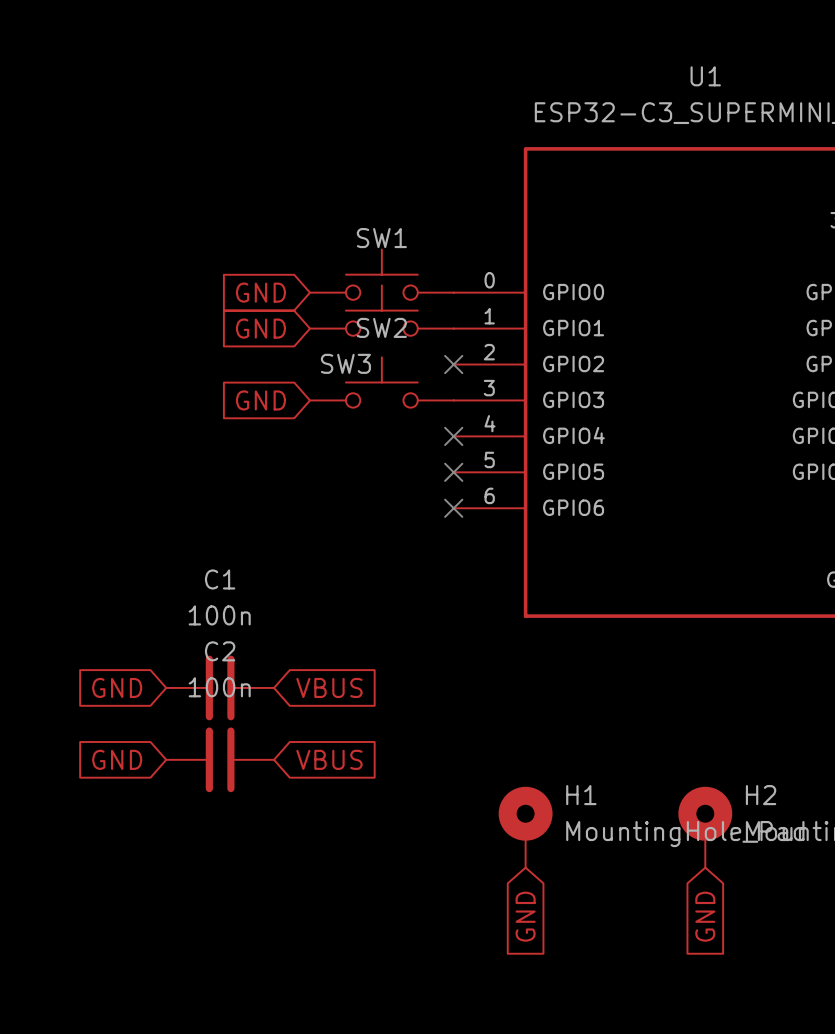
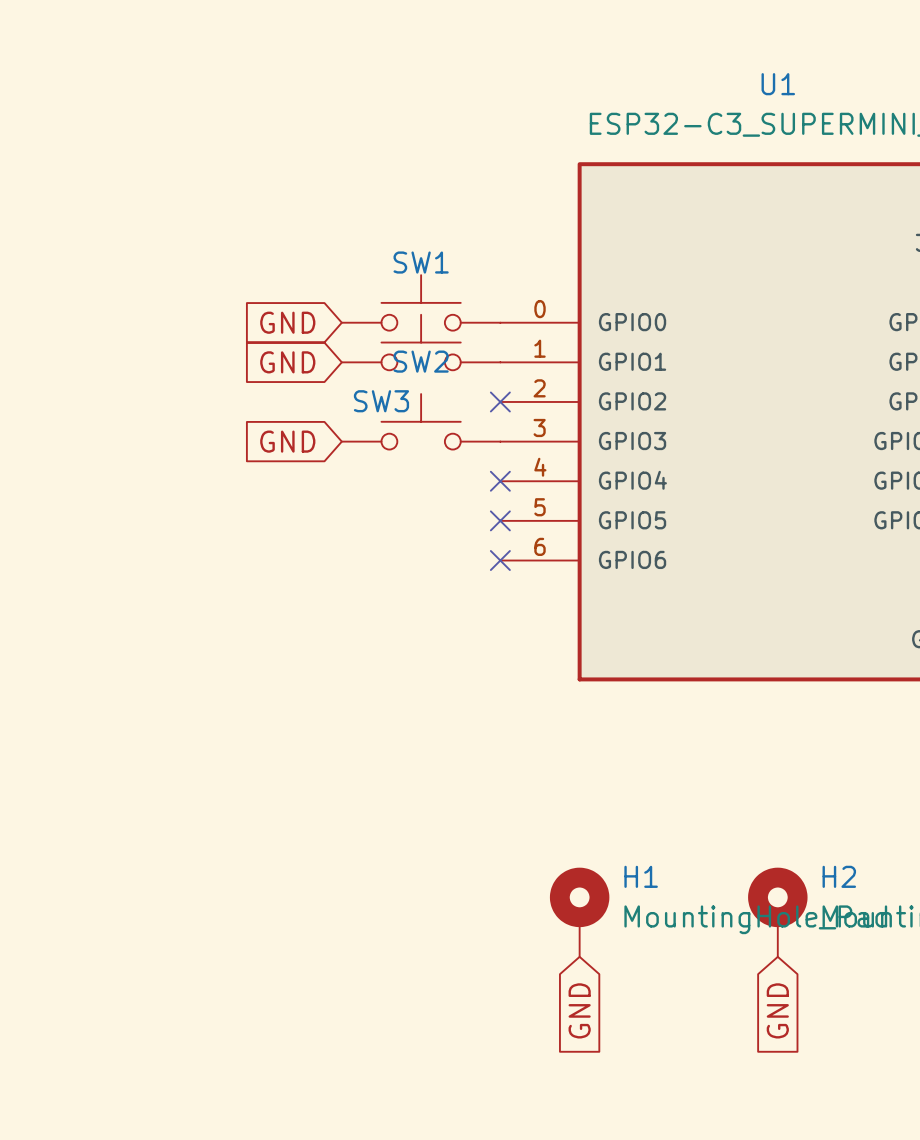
global label: GND (117, 687) -> none
C1: 100n (220, 687) -> none
global label: VBUS (329, 687) -> none
global label: GND (117, 759) -> none
C2: 100n (220, 759) -> none
global label: VBUS (329, 759) -> none

